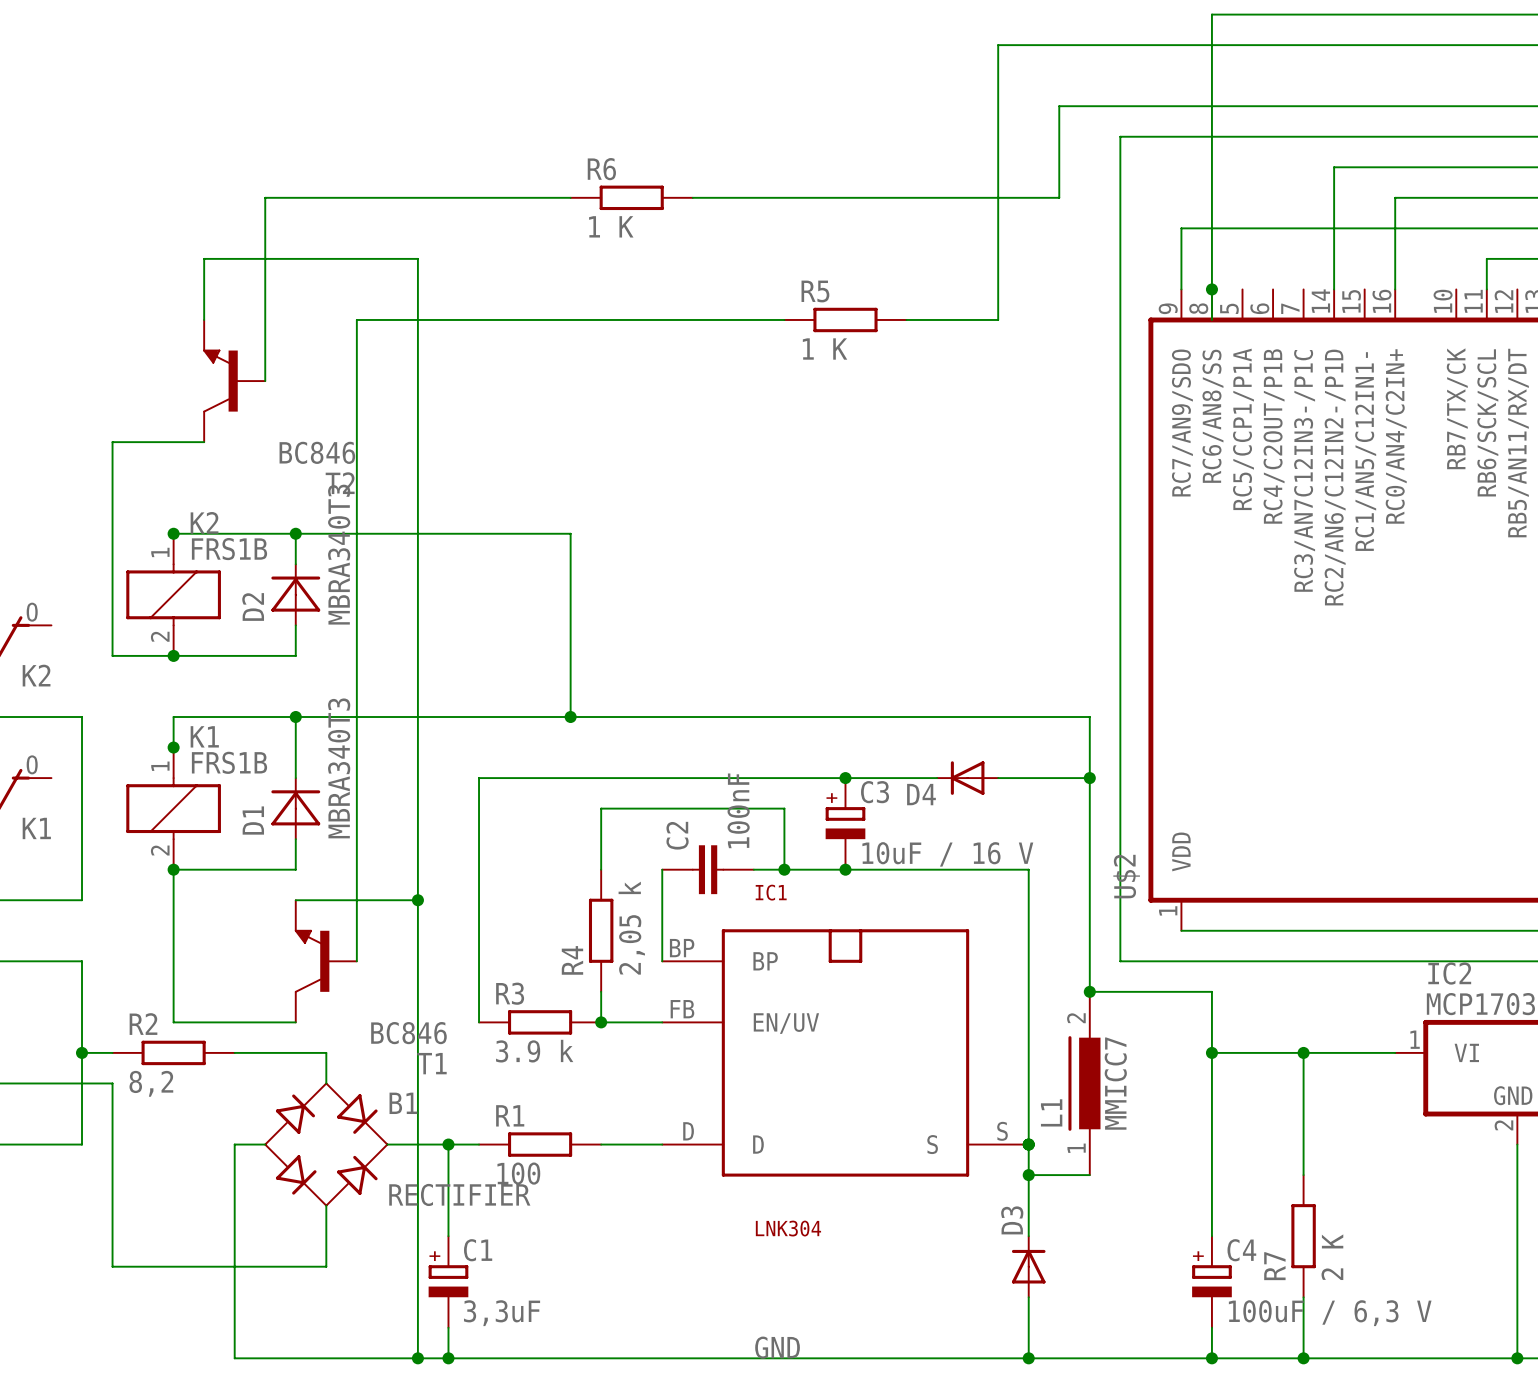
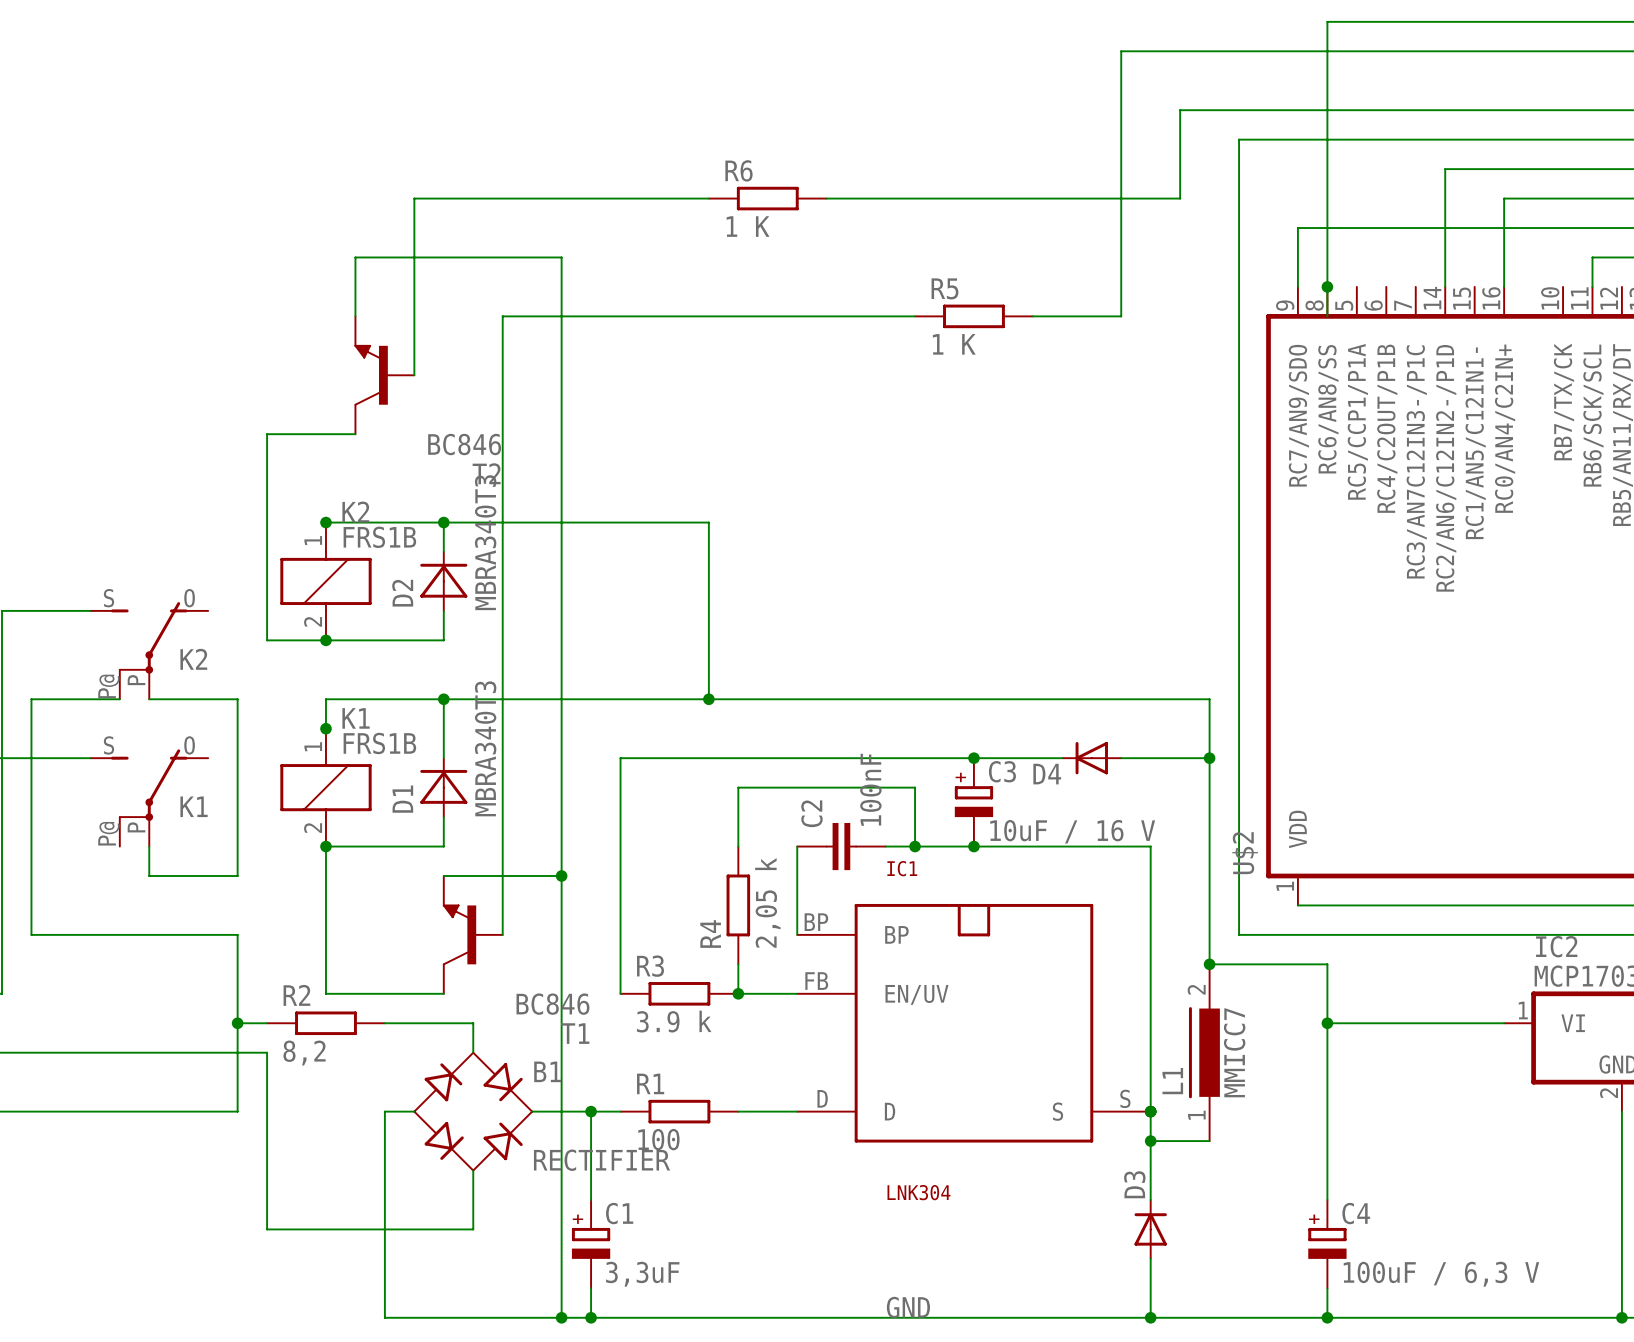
wire: (1303, 1052) (1303, 1175) -> none
junction: (1303, 1052) -> none
R7: 2 K (1303, 1236) -> none
wire: (1303, 1297) (1303, 1358) -> none
junction: (1303, 1358) -> none

